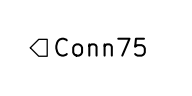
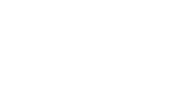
hierarchical label: Conn75 (100, 47) -> none

